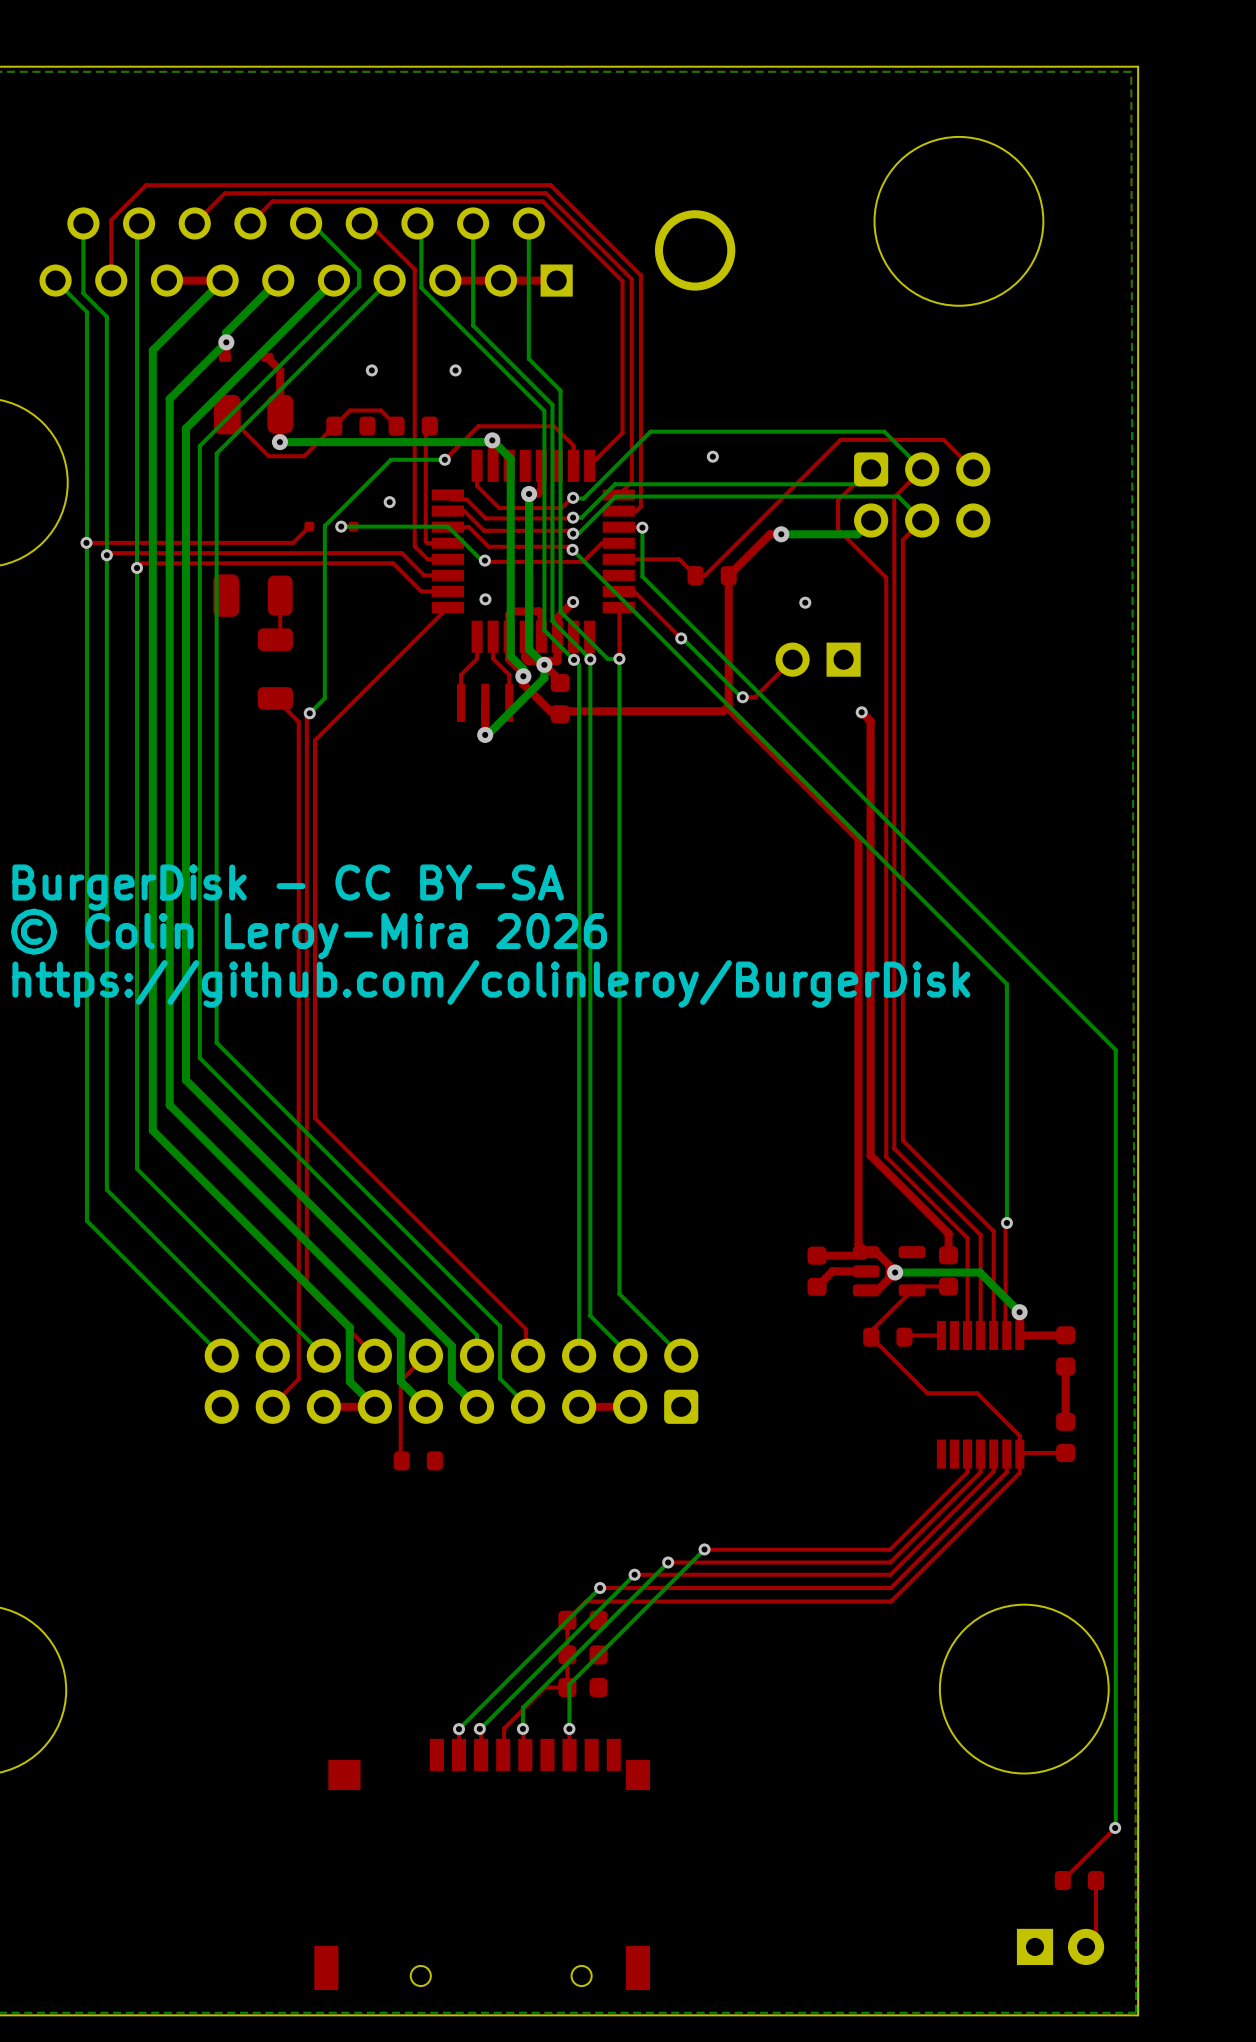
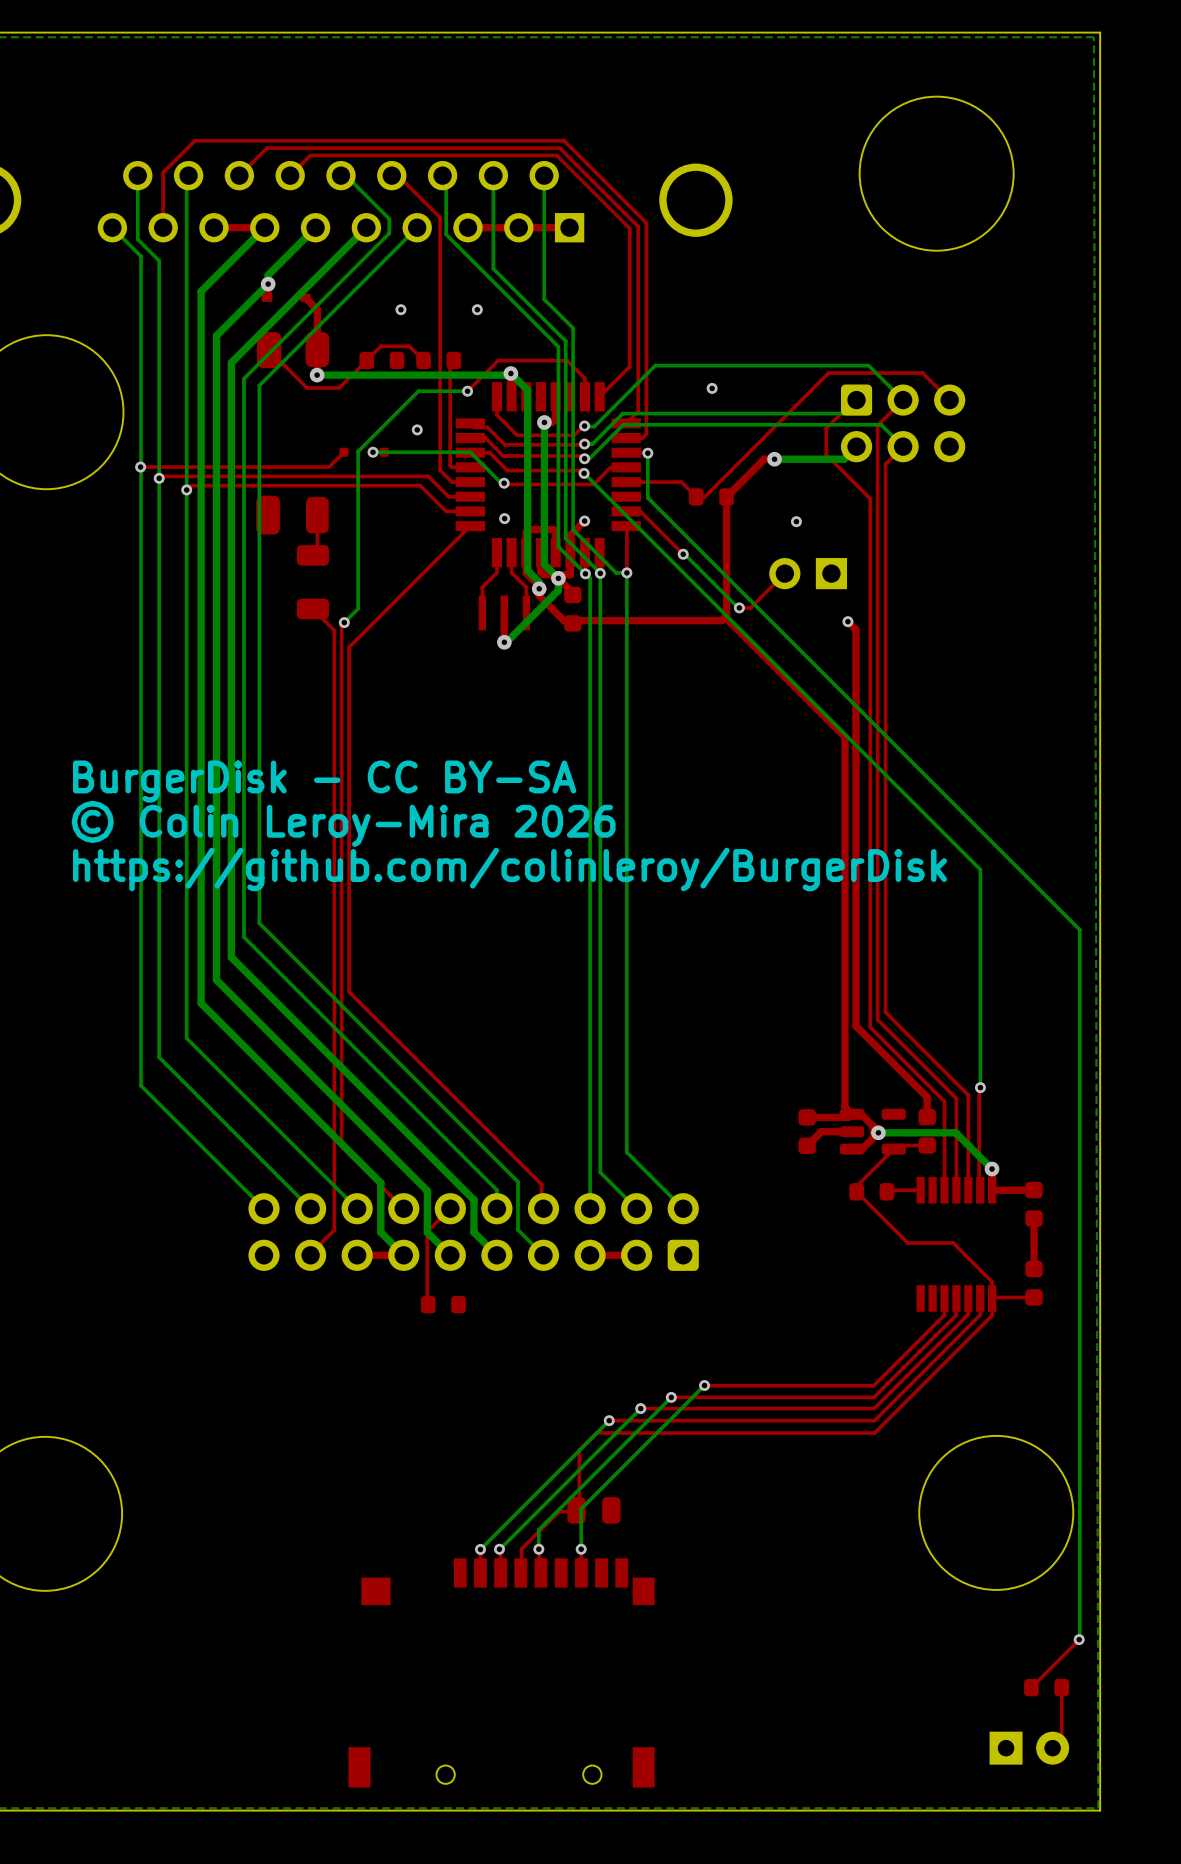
part: (582, 1620) -> none
part: (582, 1654) -> none
part footprint: [558, 1678, 608, 1698] -> [567, 1497, 621, 1524]

